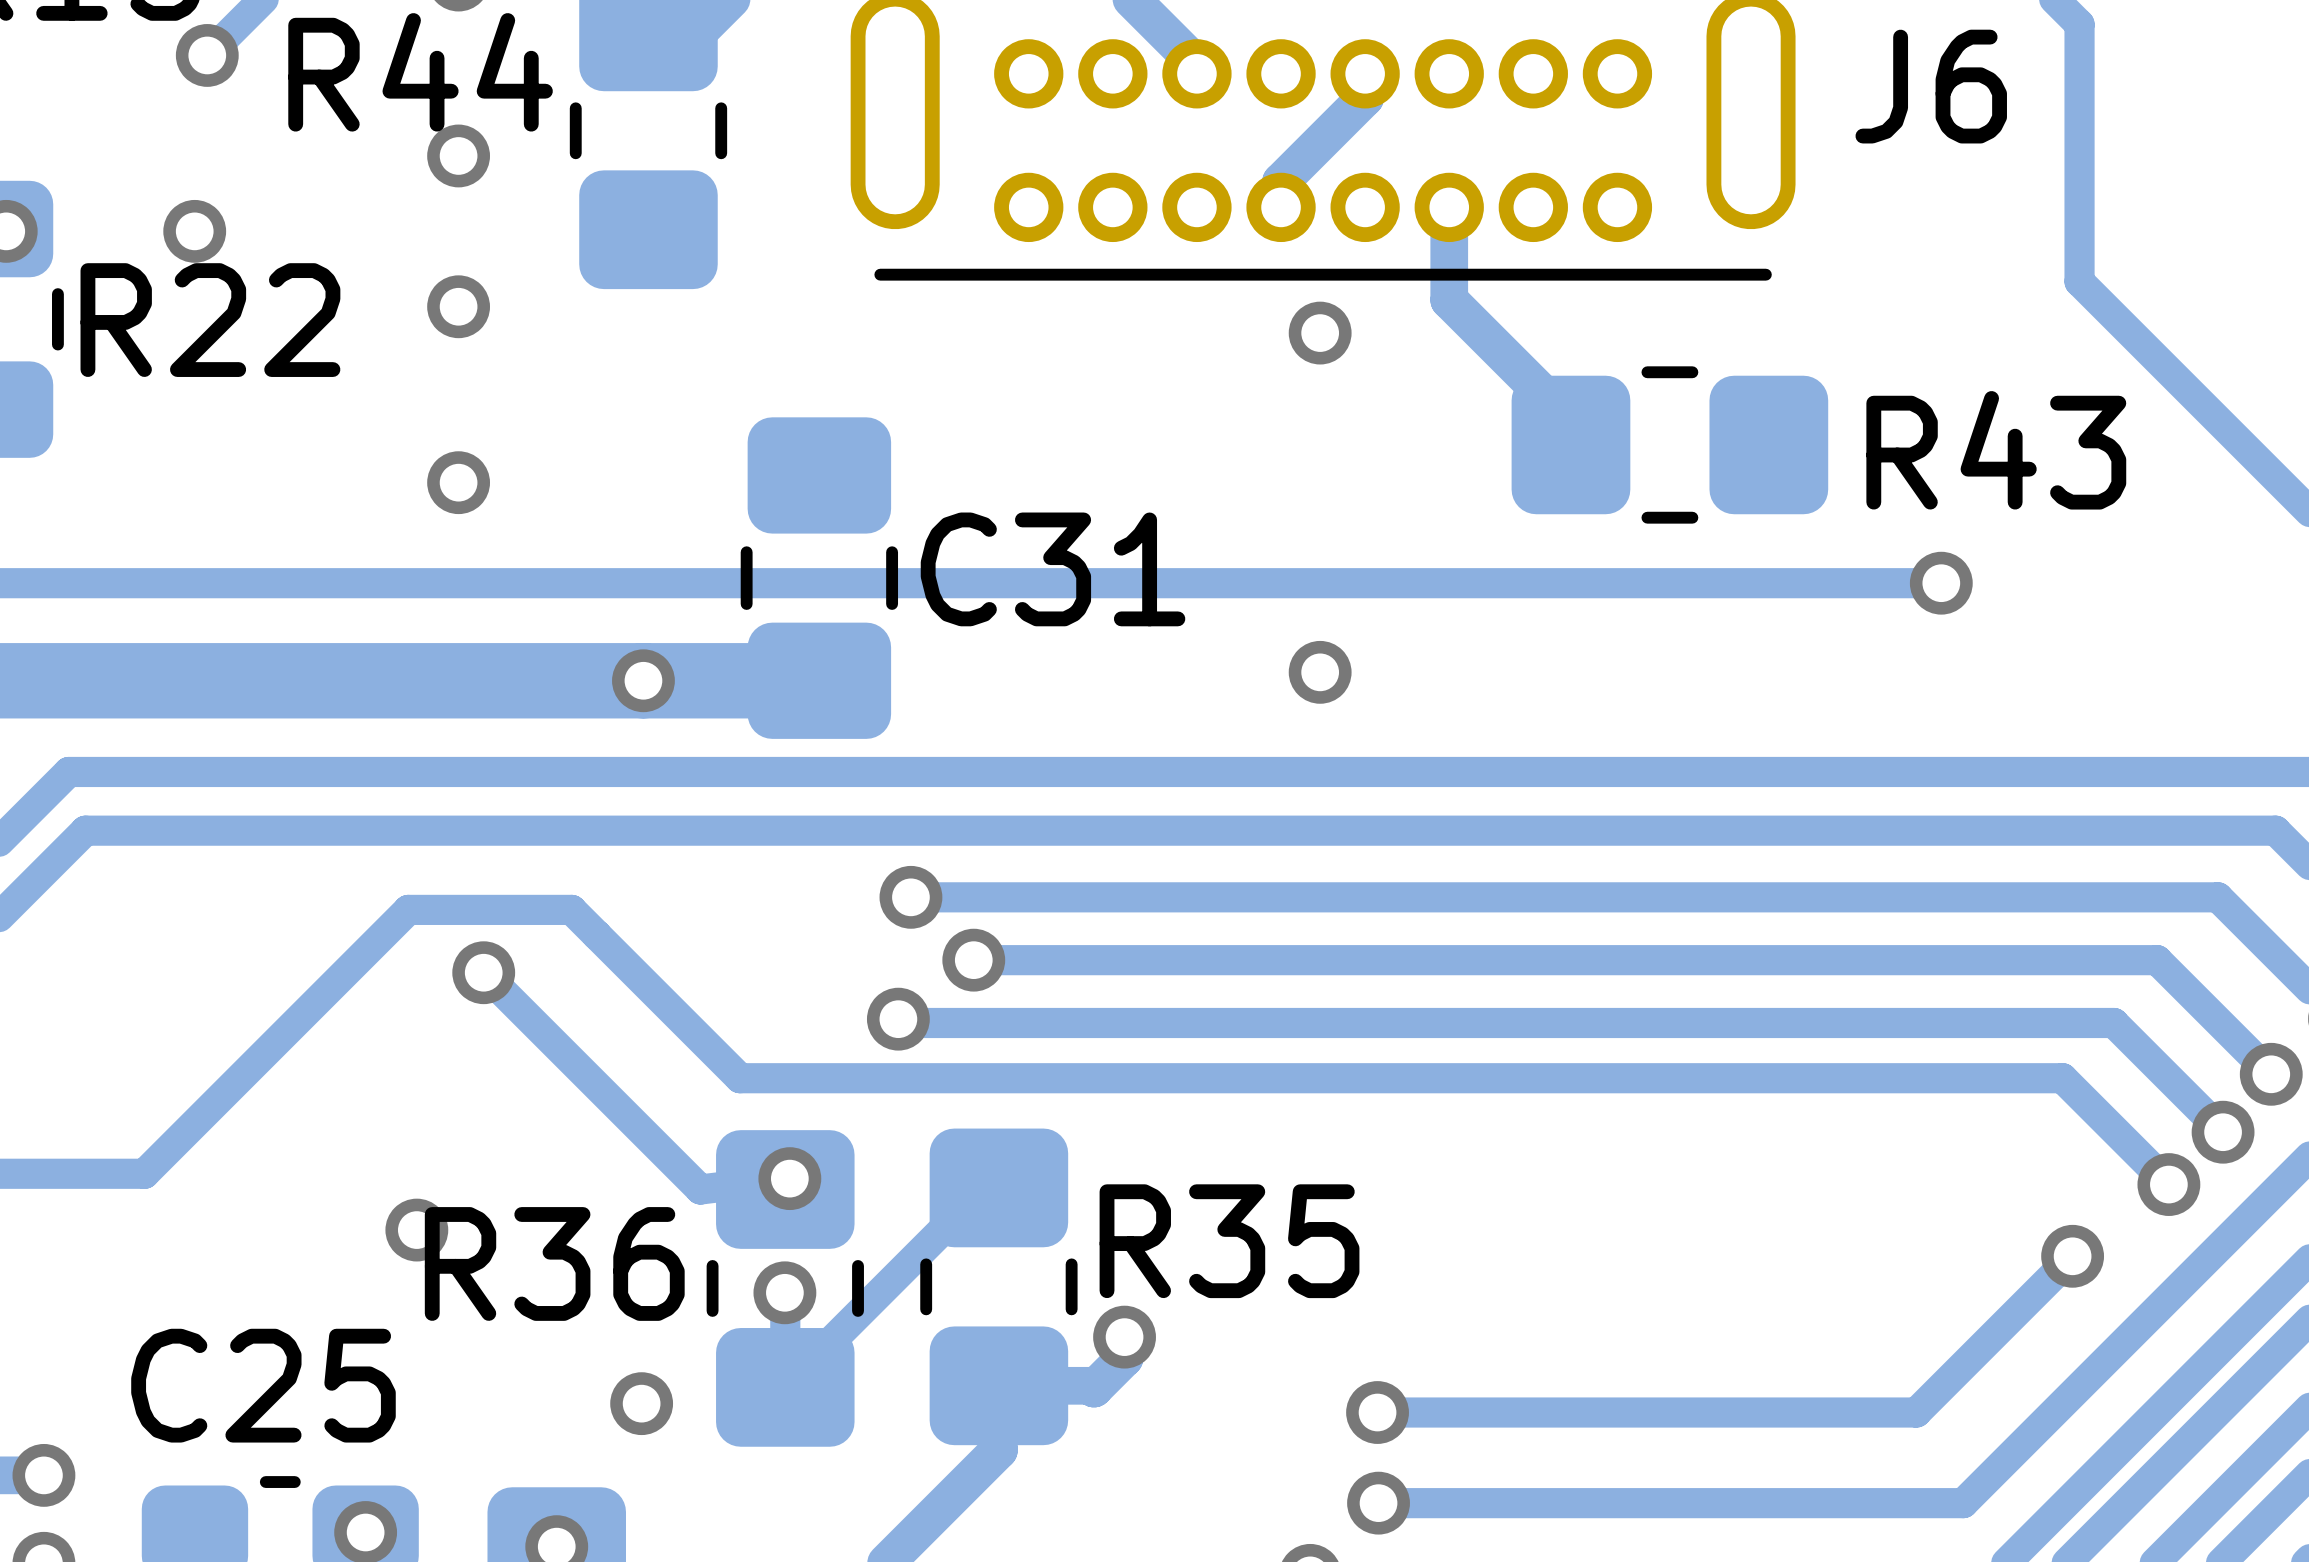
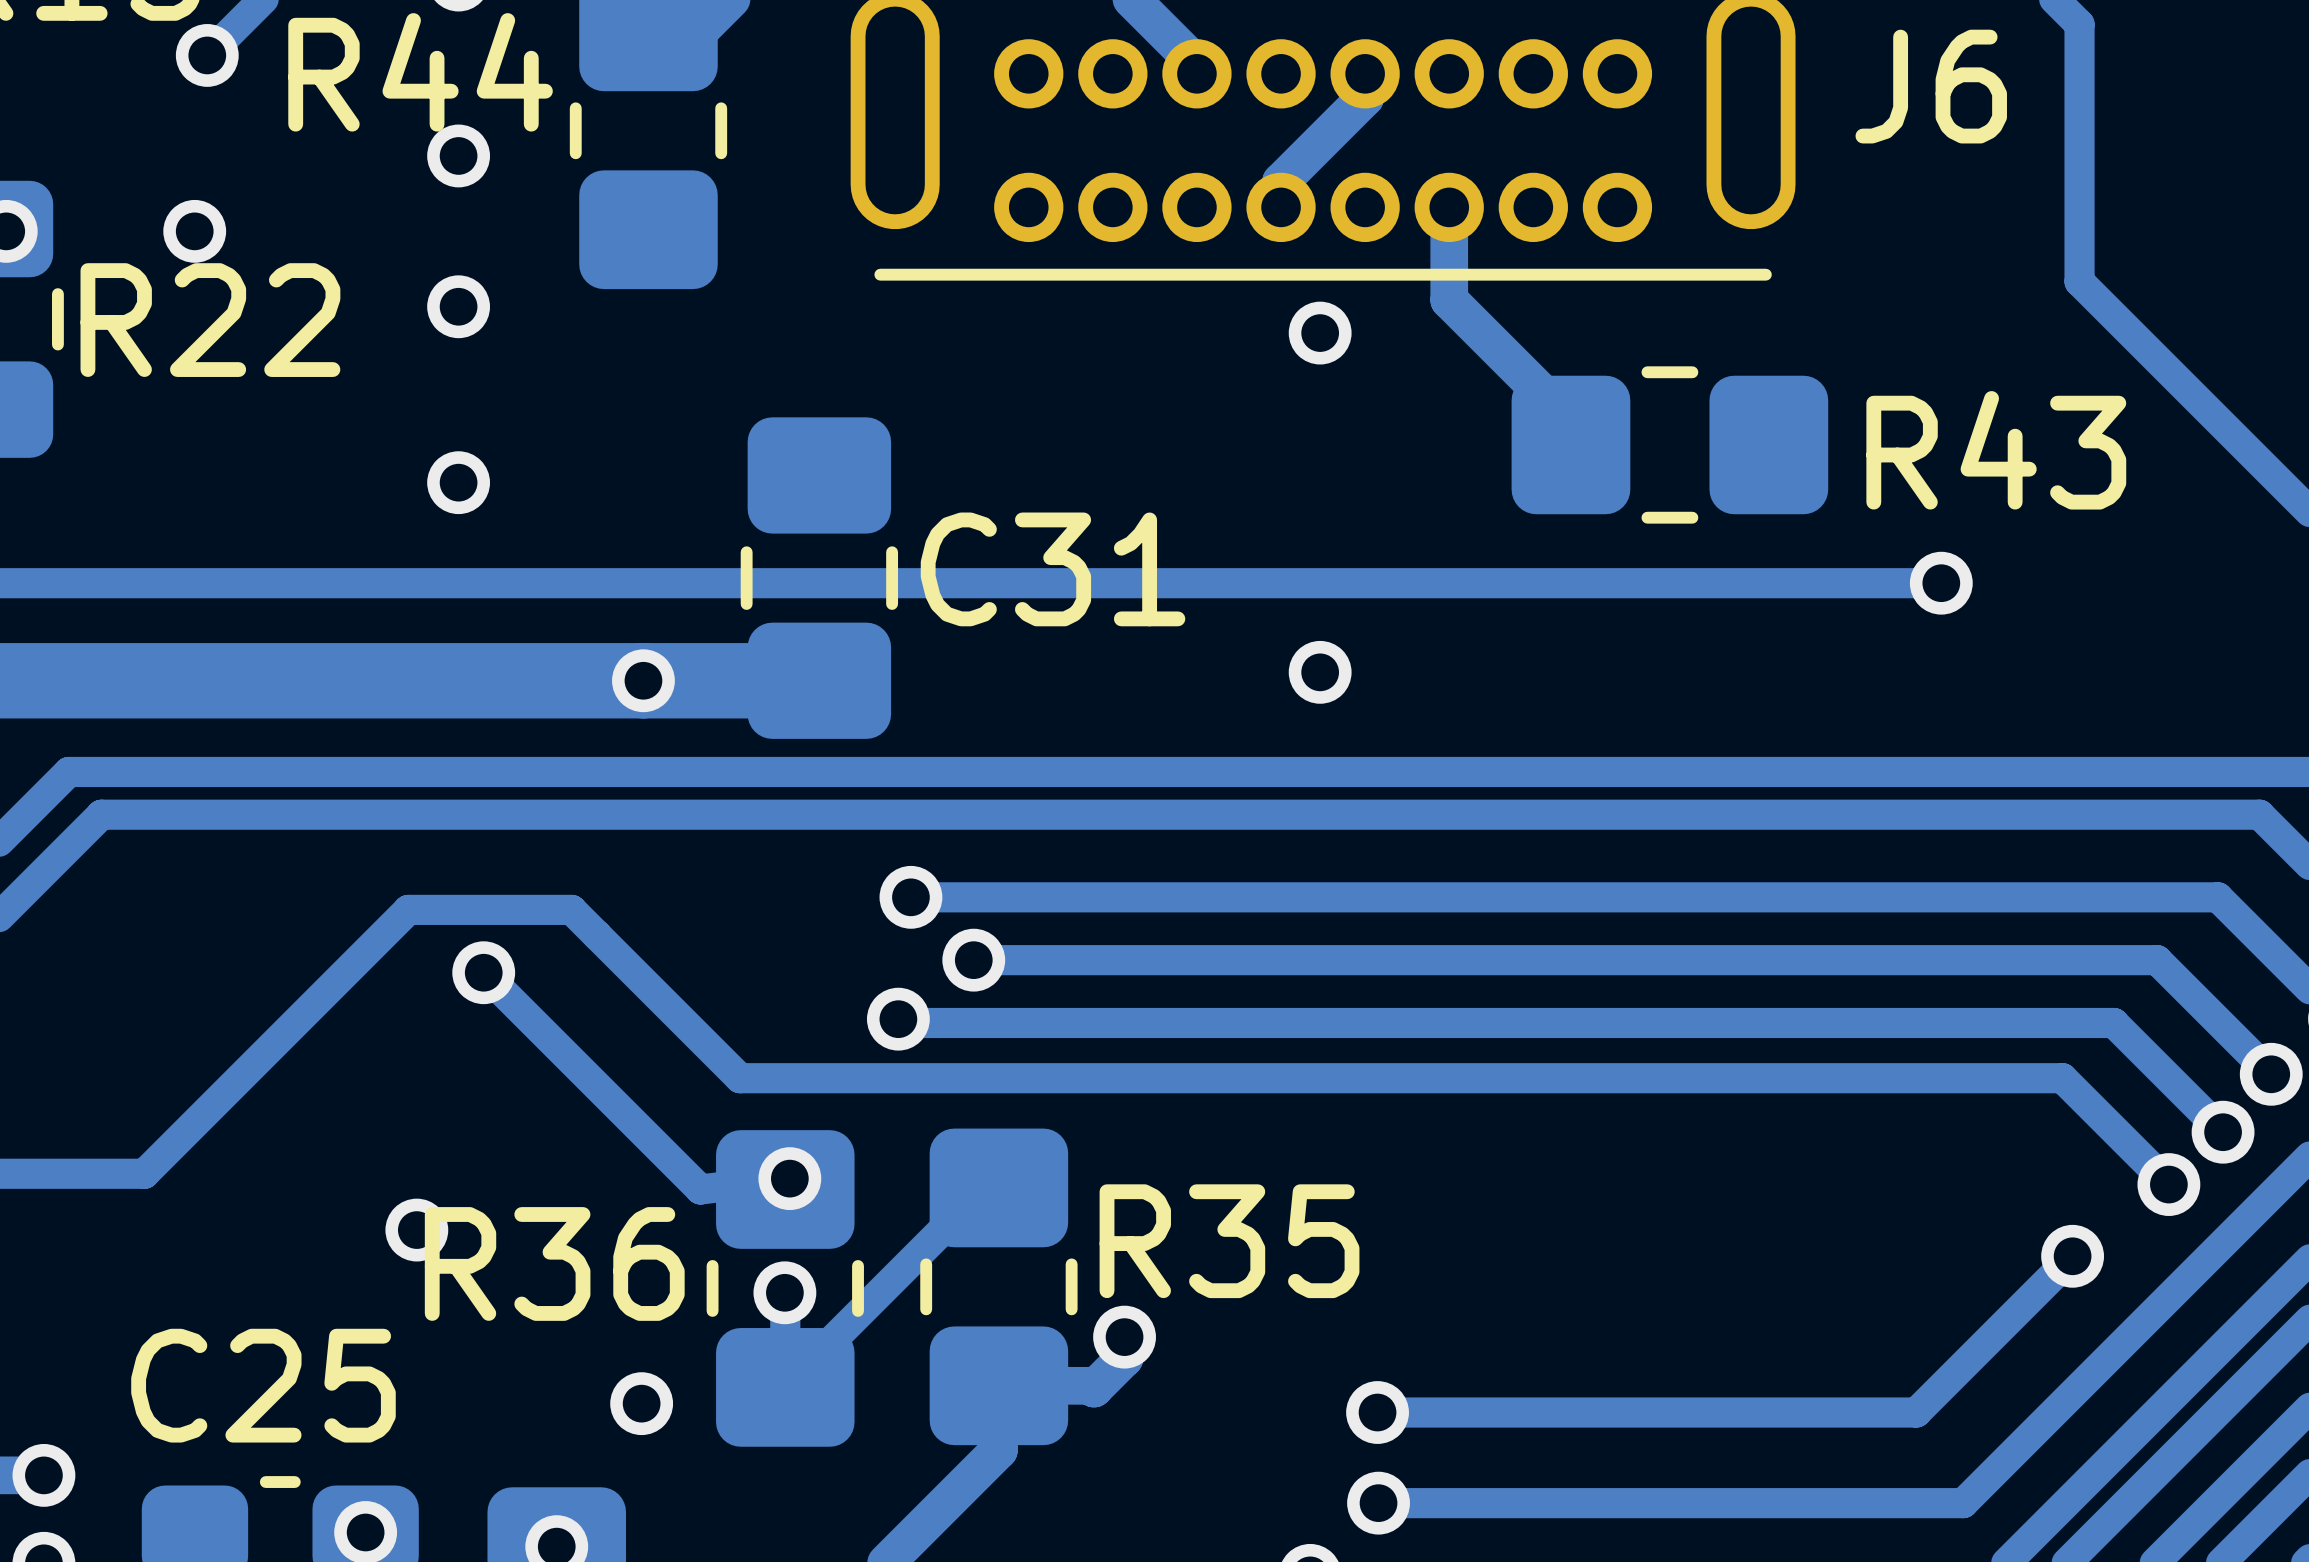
track: (2275, 830) (85, 830) -> (2275, 830) (2259, 814) (101, 814) (85, 830)

